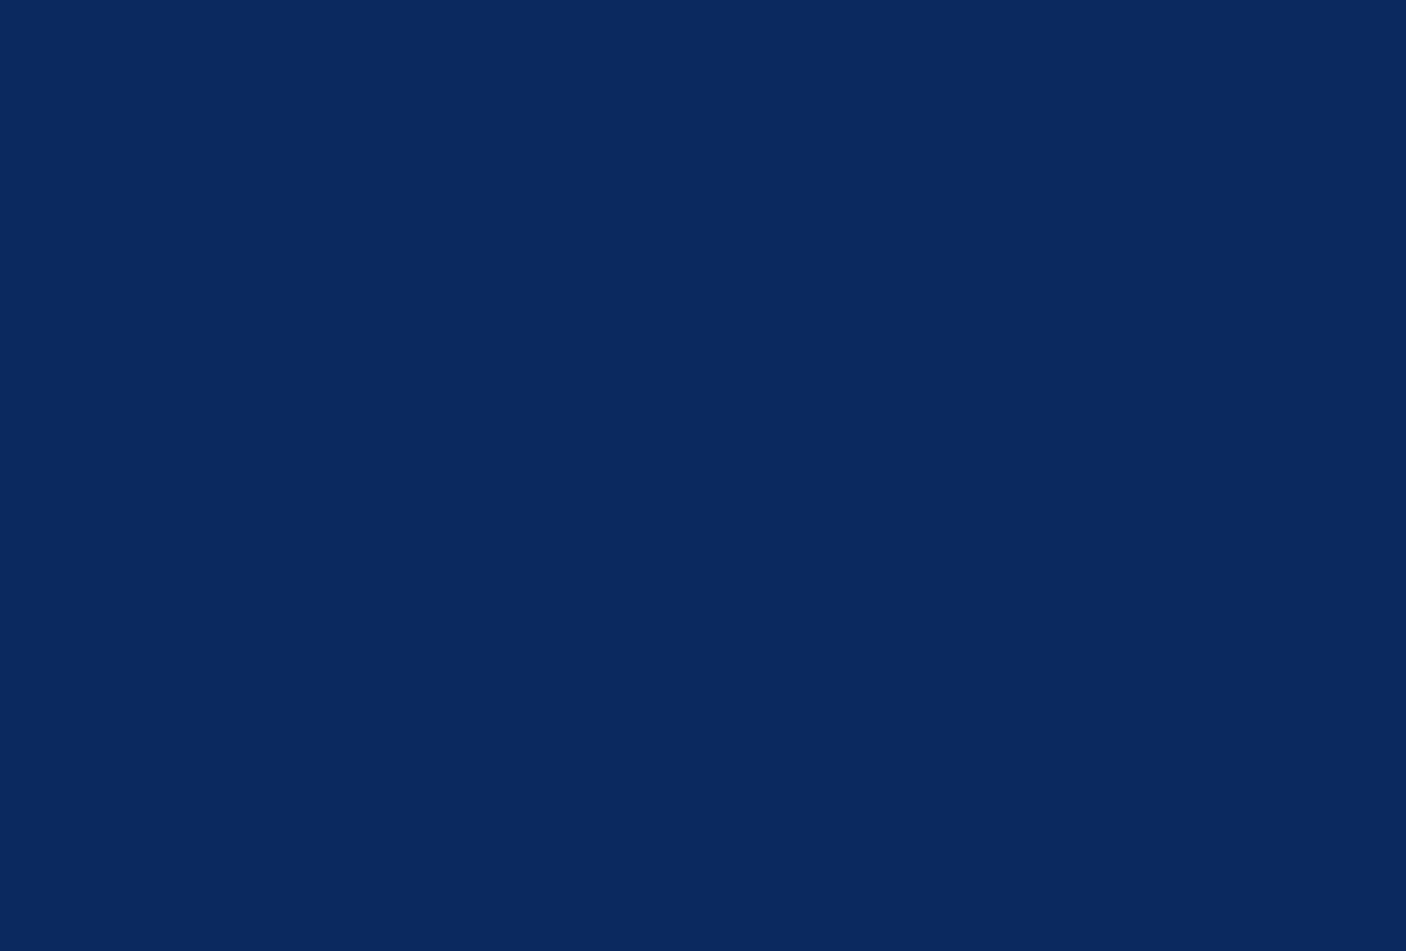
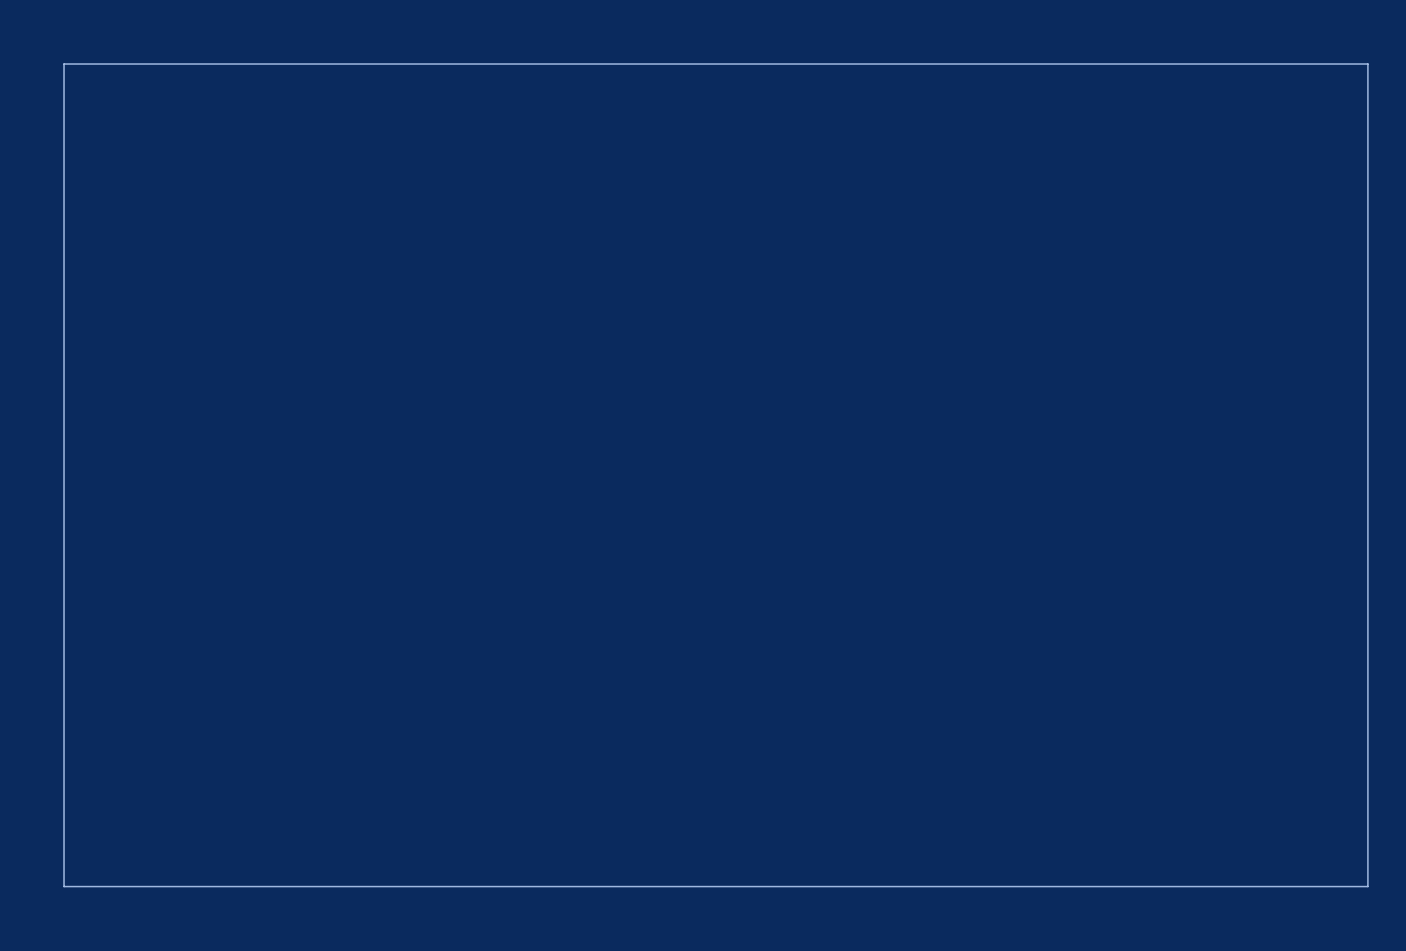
line: none -> (64, 64) (1367, 64) (1367, 886) (64, 886) (64, 64)

